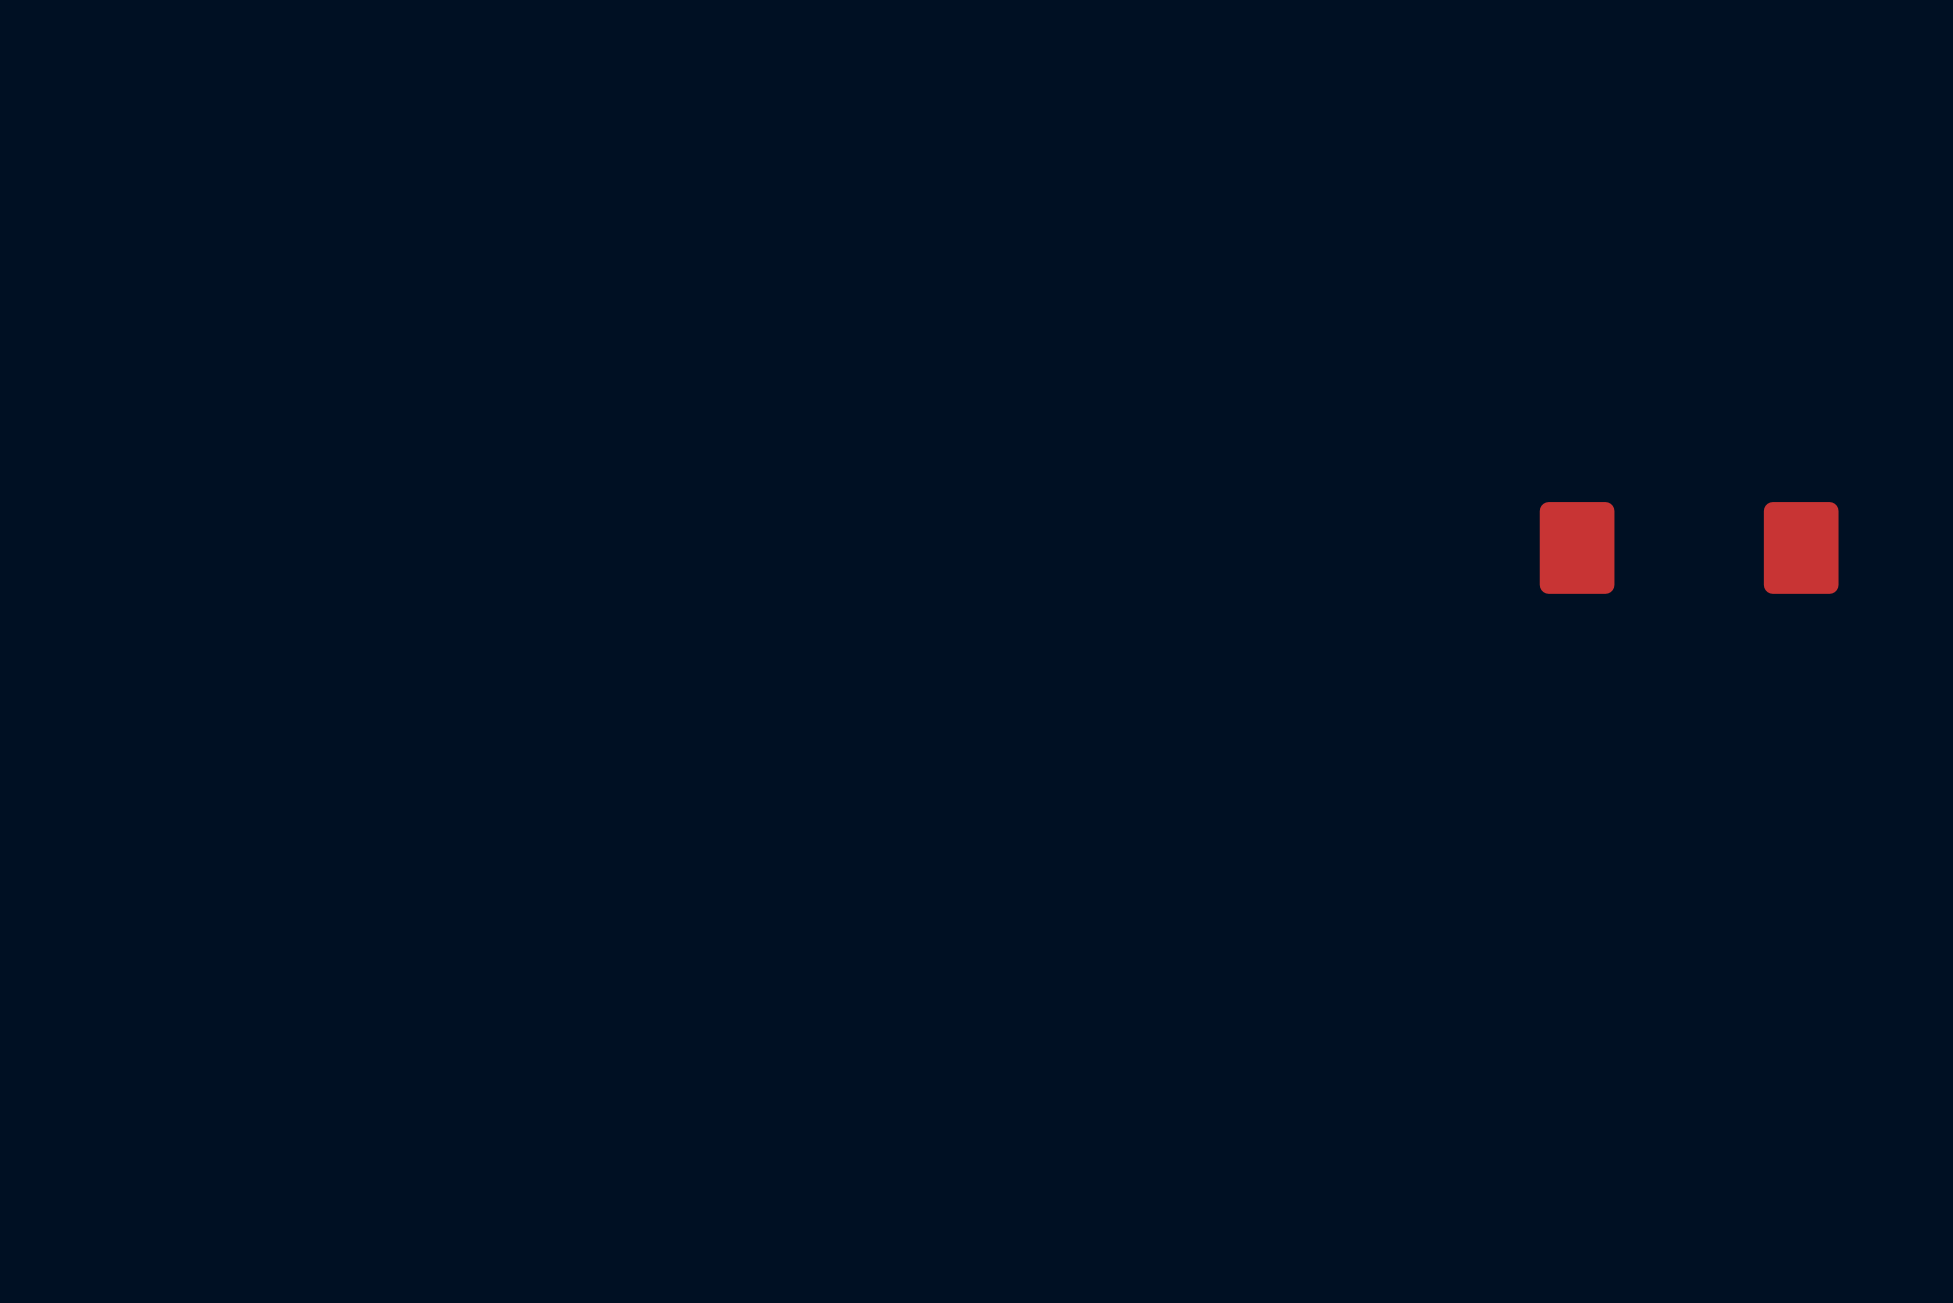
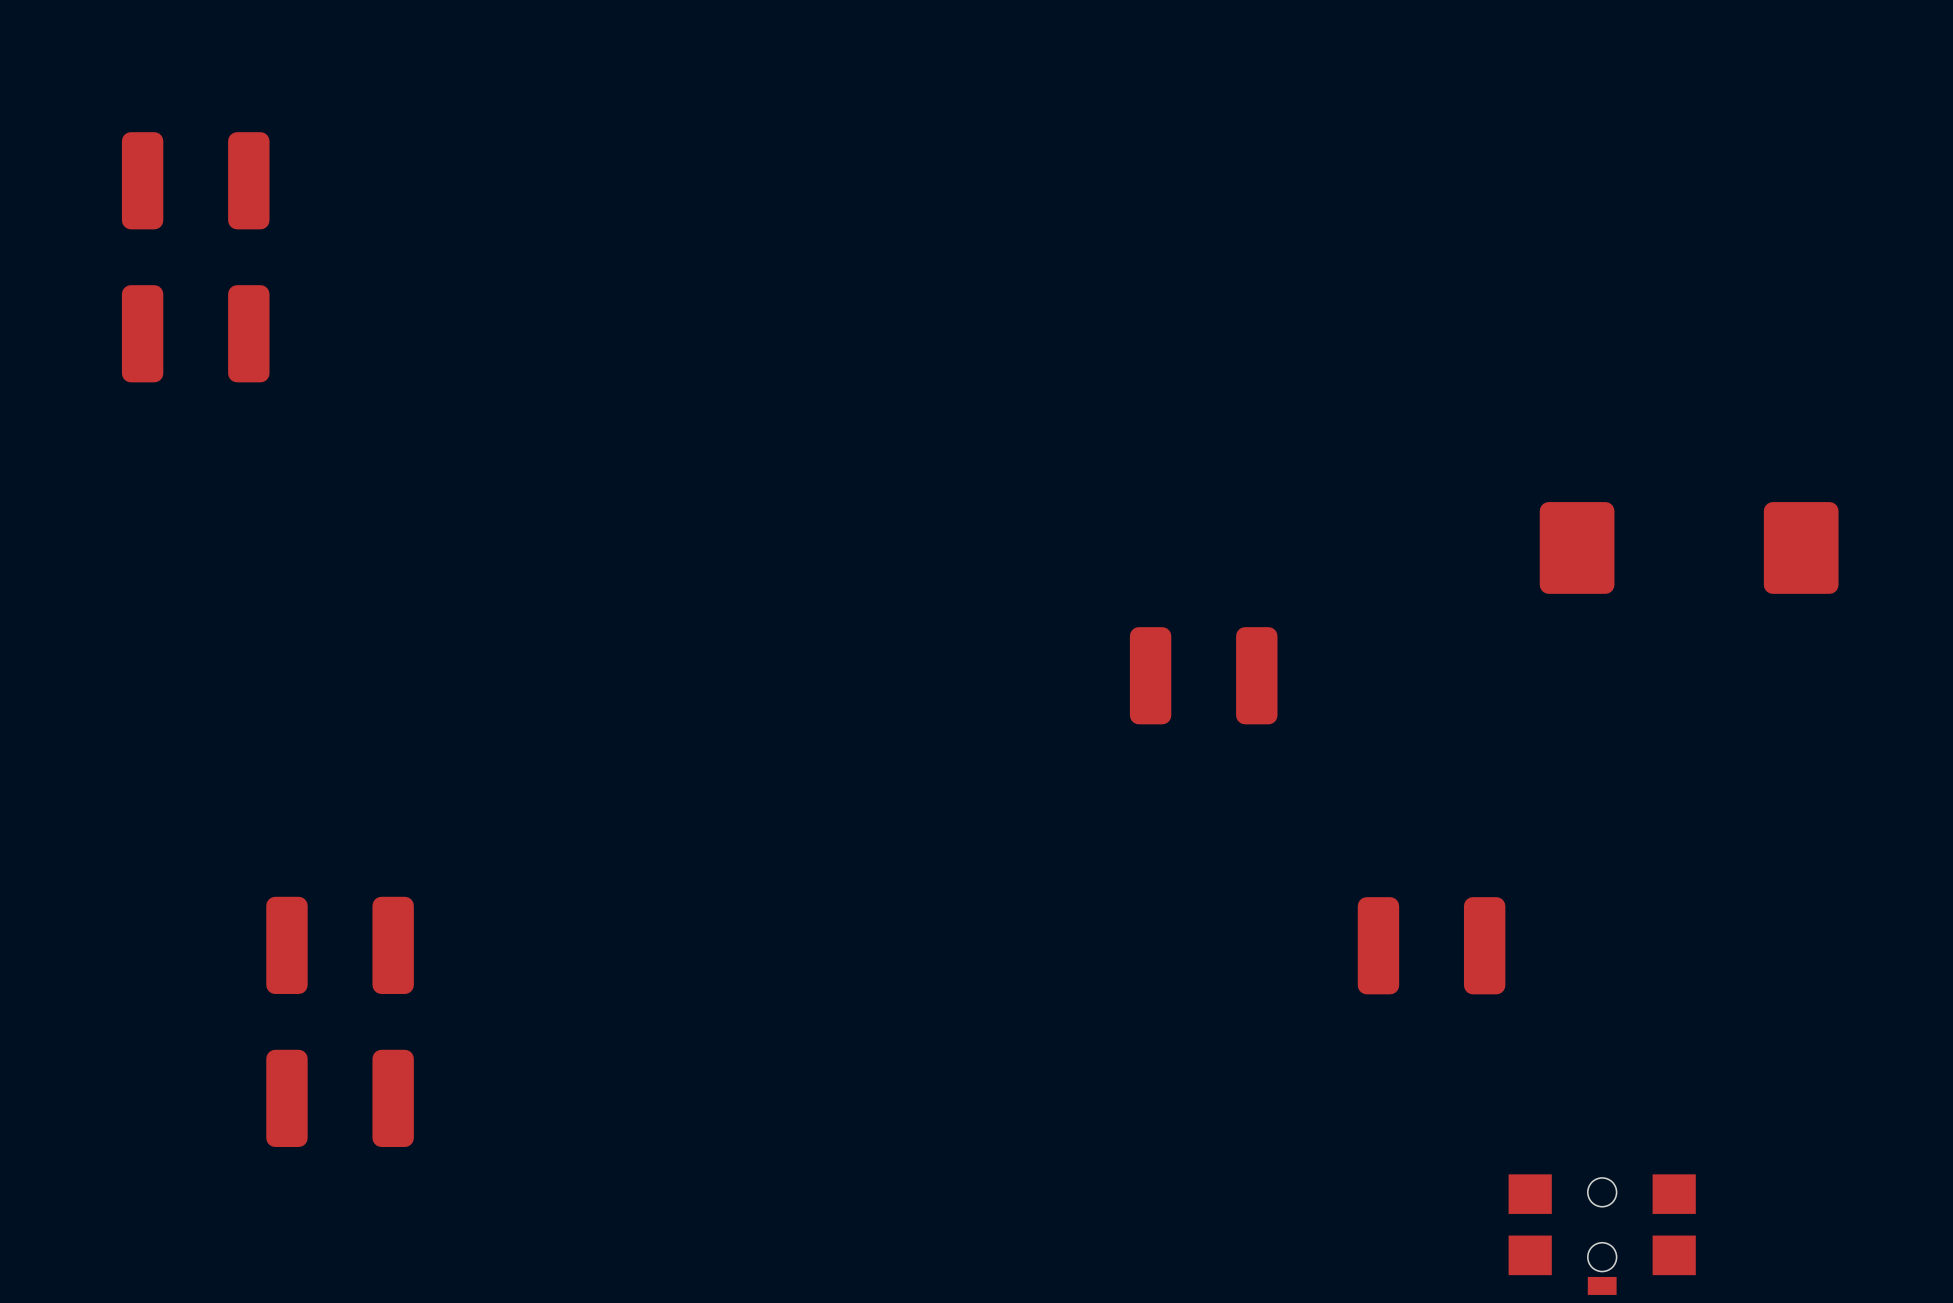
part: none -> (195, 180)
part: none -> (195, 333)
part: none -> (1203, 675)
part: none -> (340, 945)
part: none -> (1431, 945)
part: none -> (340, 1098)
part: none -> (1602, 1234)

